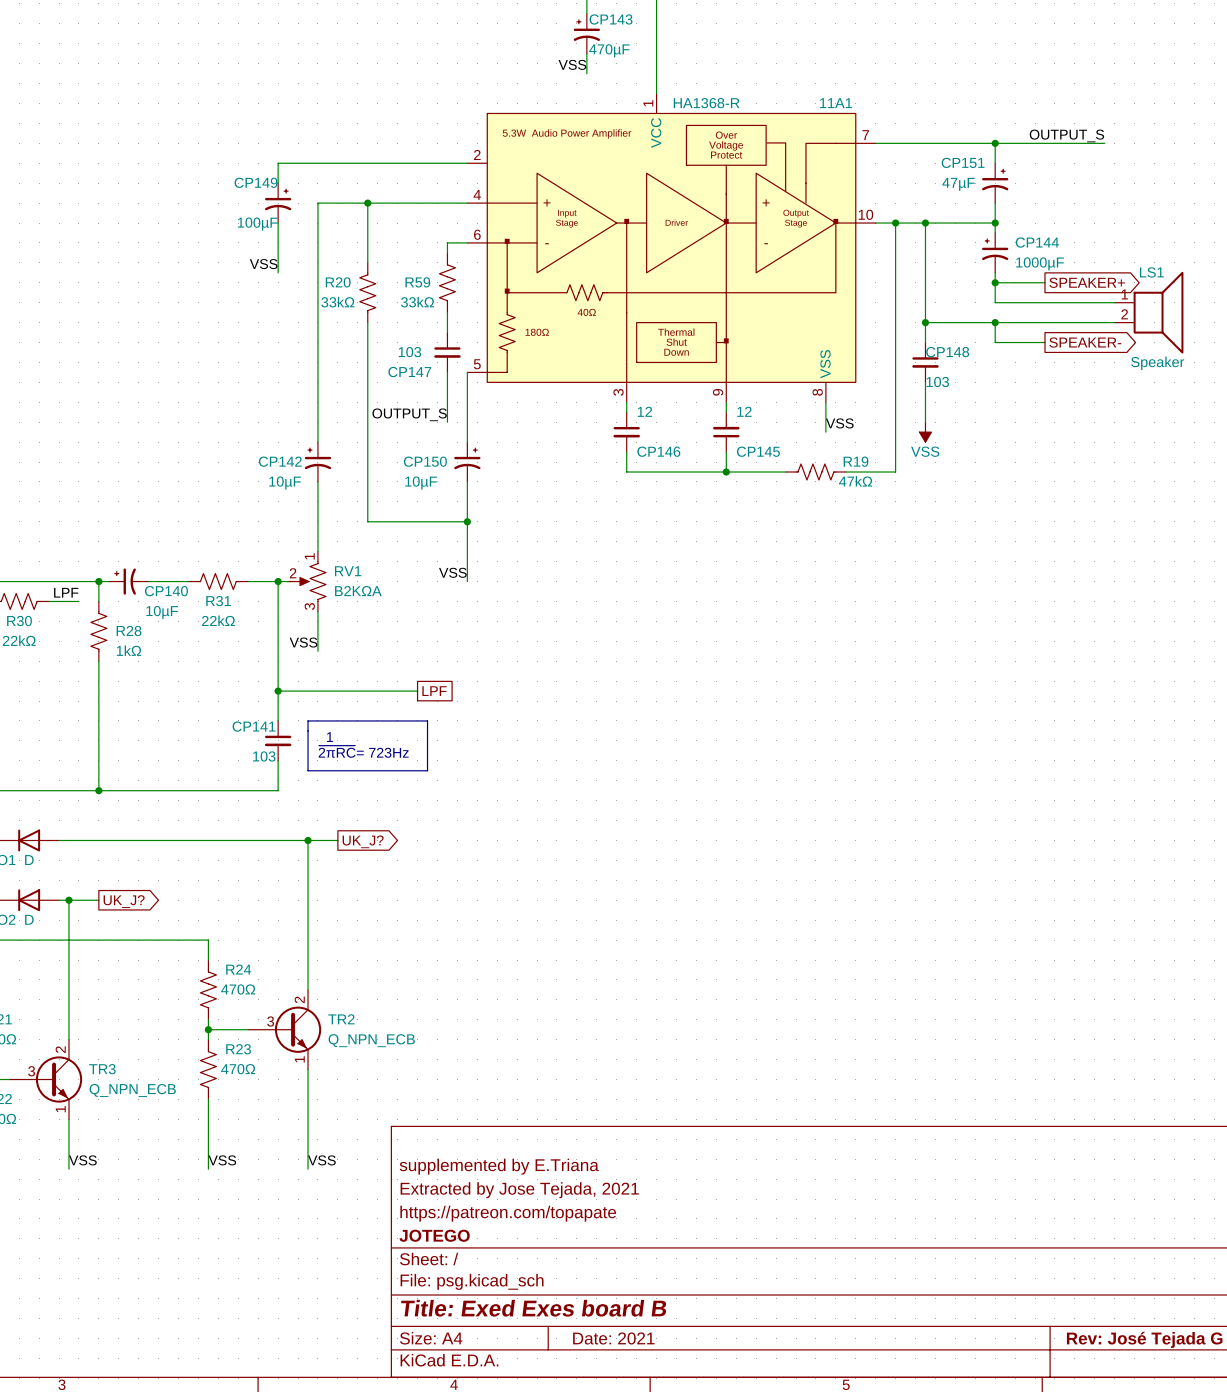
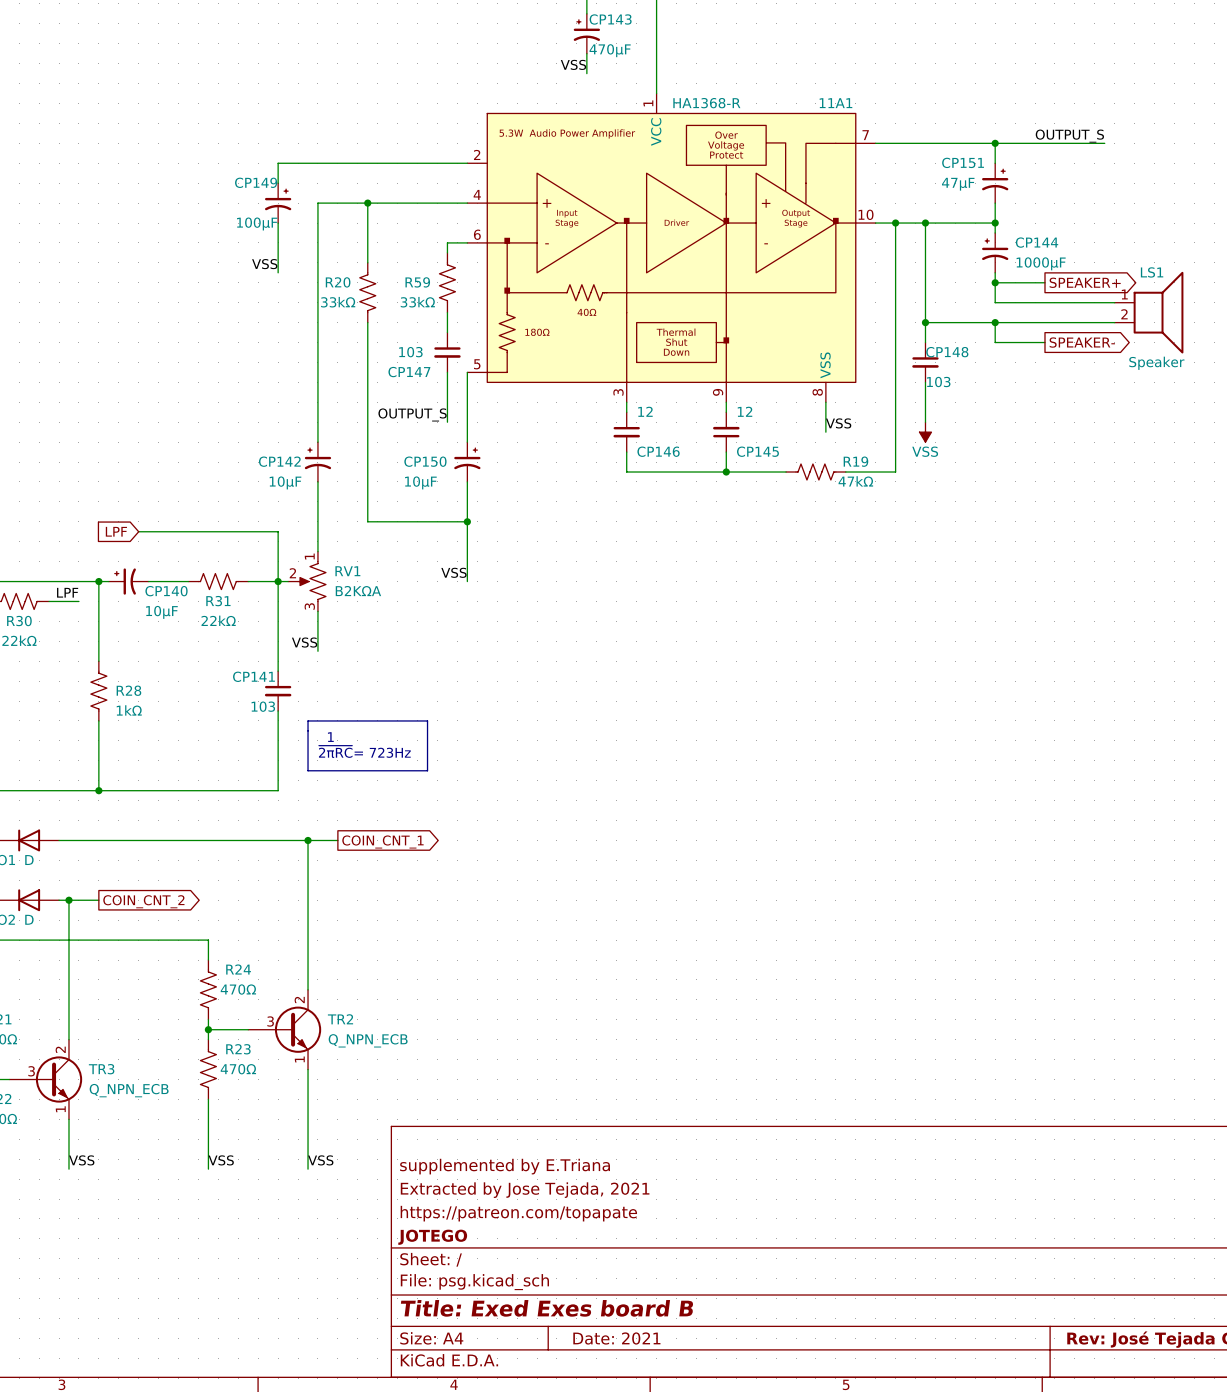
global label: none -> LPF (116, 531)
wire: none -> (138, 531) (278, 531) (278, 581)
R28 position: (98, 631) -> (98, 691)
wire: (278, 691) (417, 691) -> none
junction: (278, 691) -> none
global label: LPF (434, 691) -> none
CP141 position: (278, 740) -> (278, 691)
global label: UK_J? (363, 841) -> COIN_CNT_1 (382, 841)
global label: UK_J? (124, 901) -> COIN_CNT_2 (143, 901)

